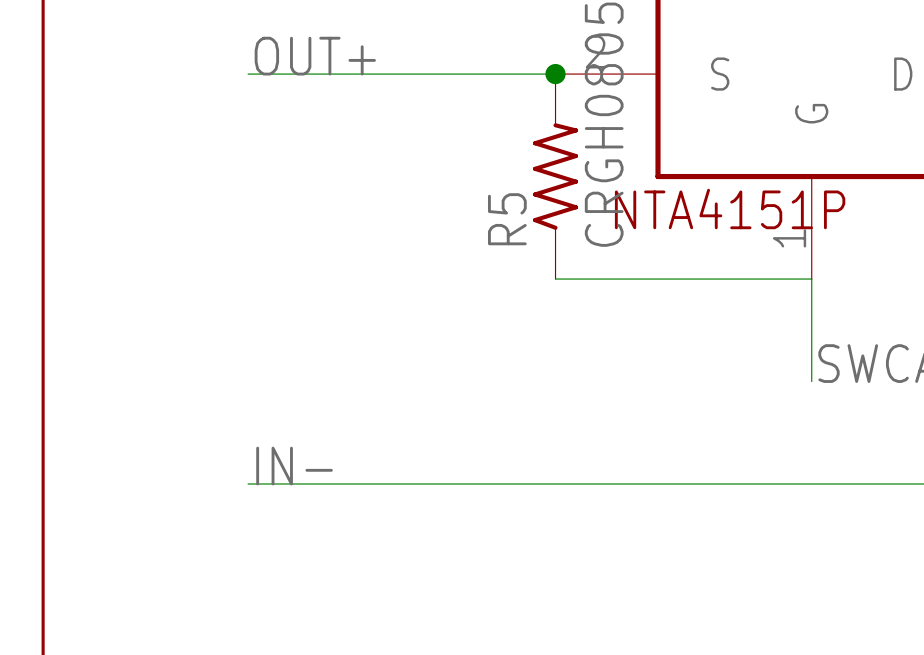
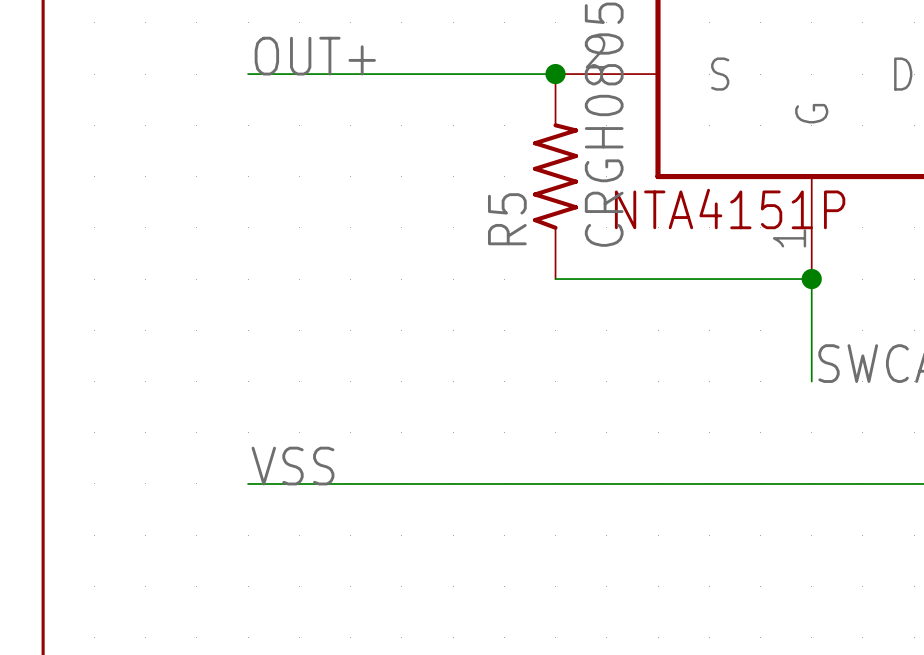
junction: none -> (811, 279)
label: IN- (294, 466) -> VSS (293, 466)

